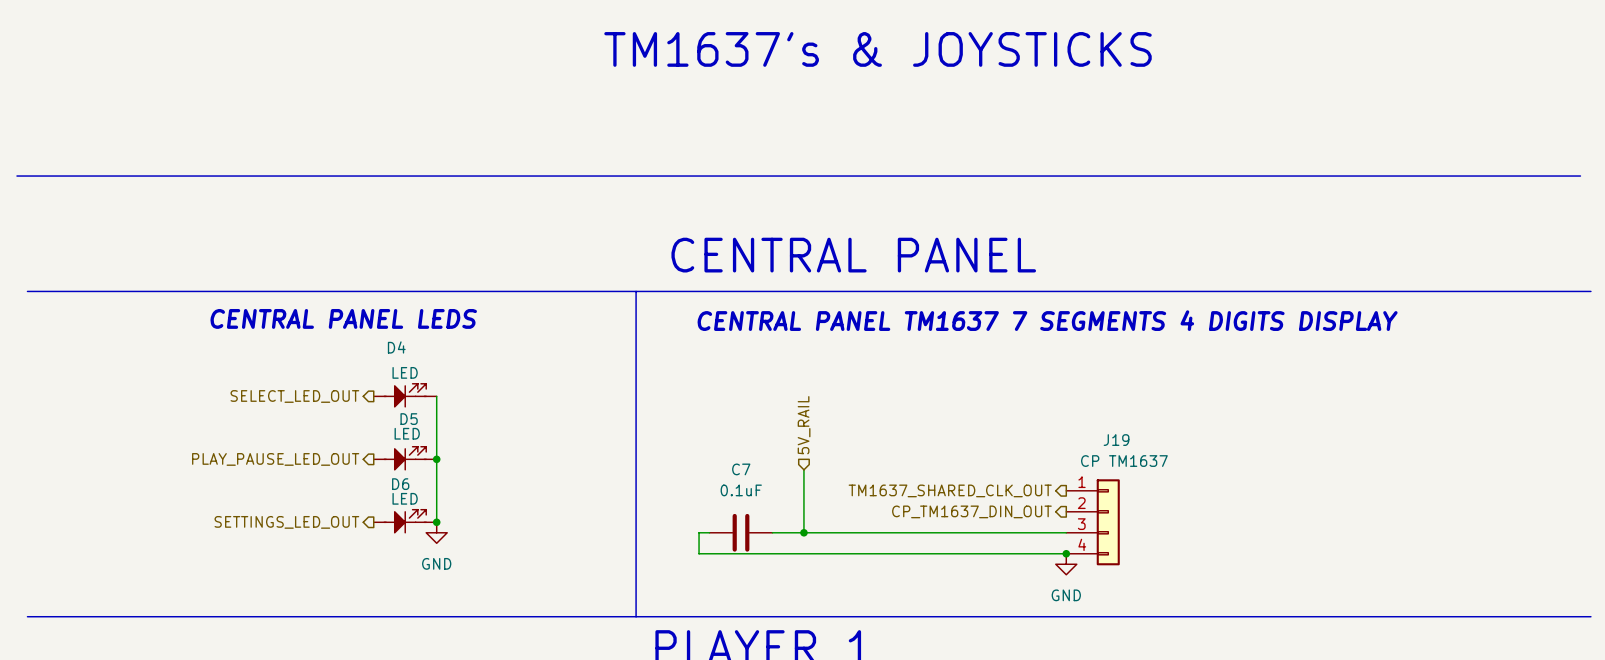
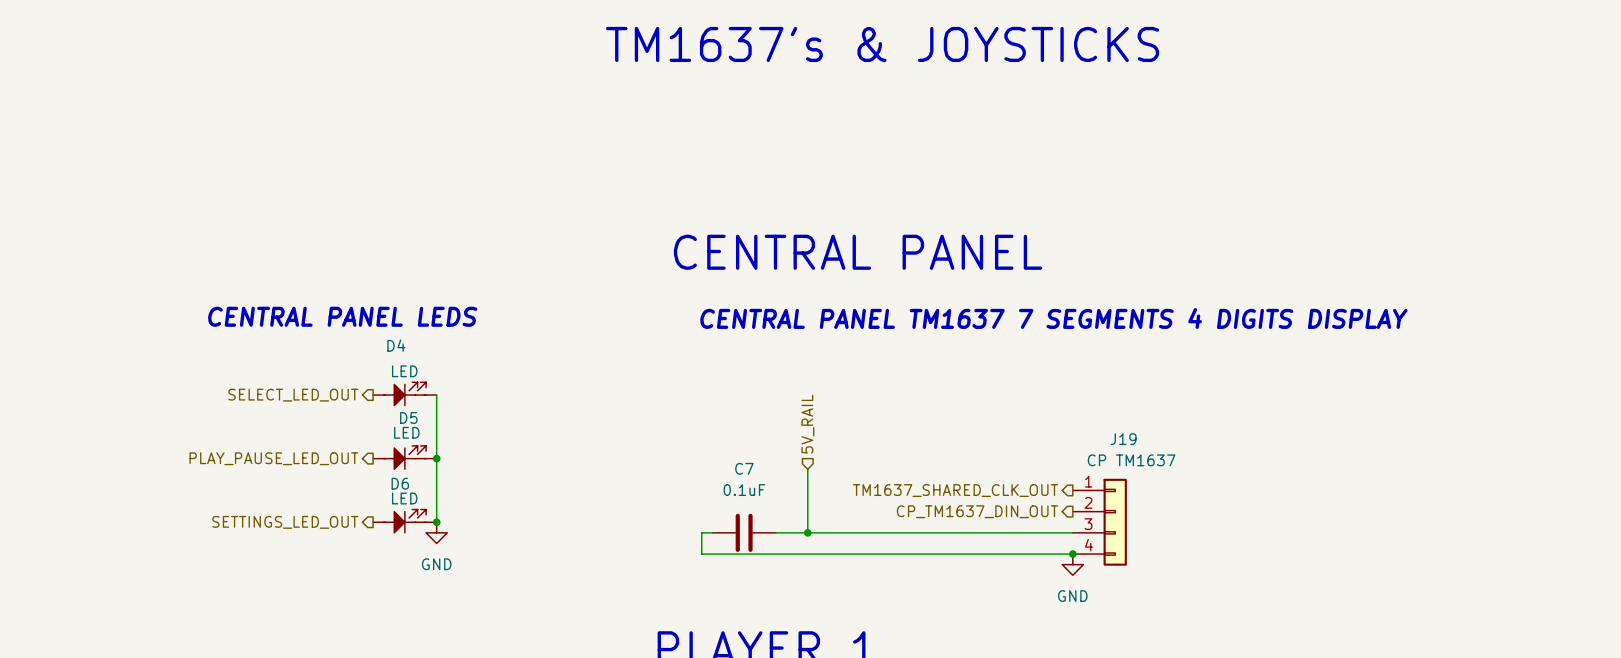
line: (16, 176) (1580, 176) -> none
line: (27, 291) (1590, 291) -> none
line: (636, 291) (636, 616) -> none
line: (27, 616) (1590, 616) -> none

